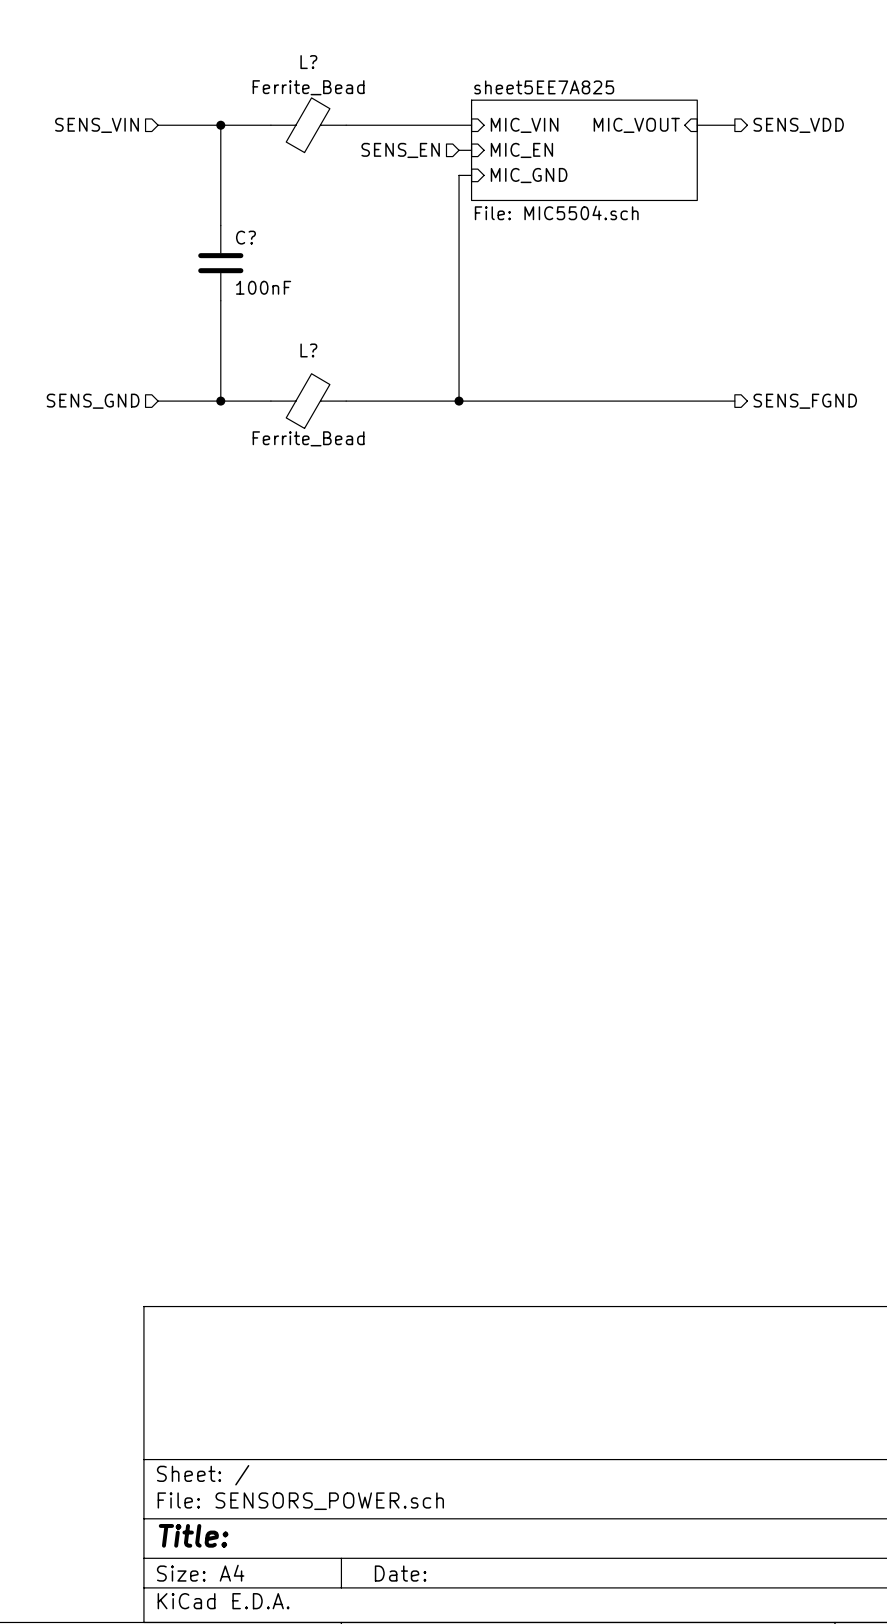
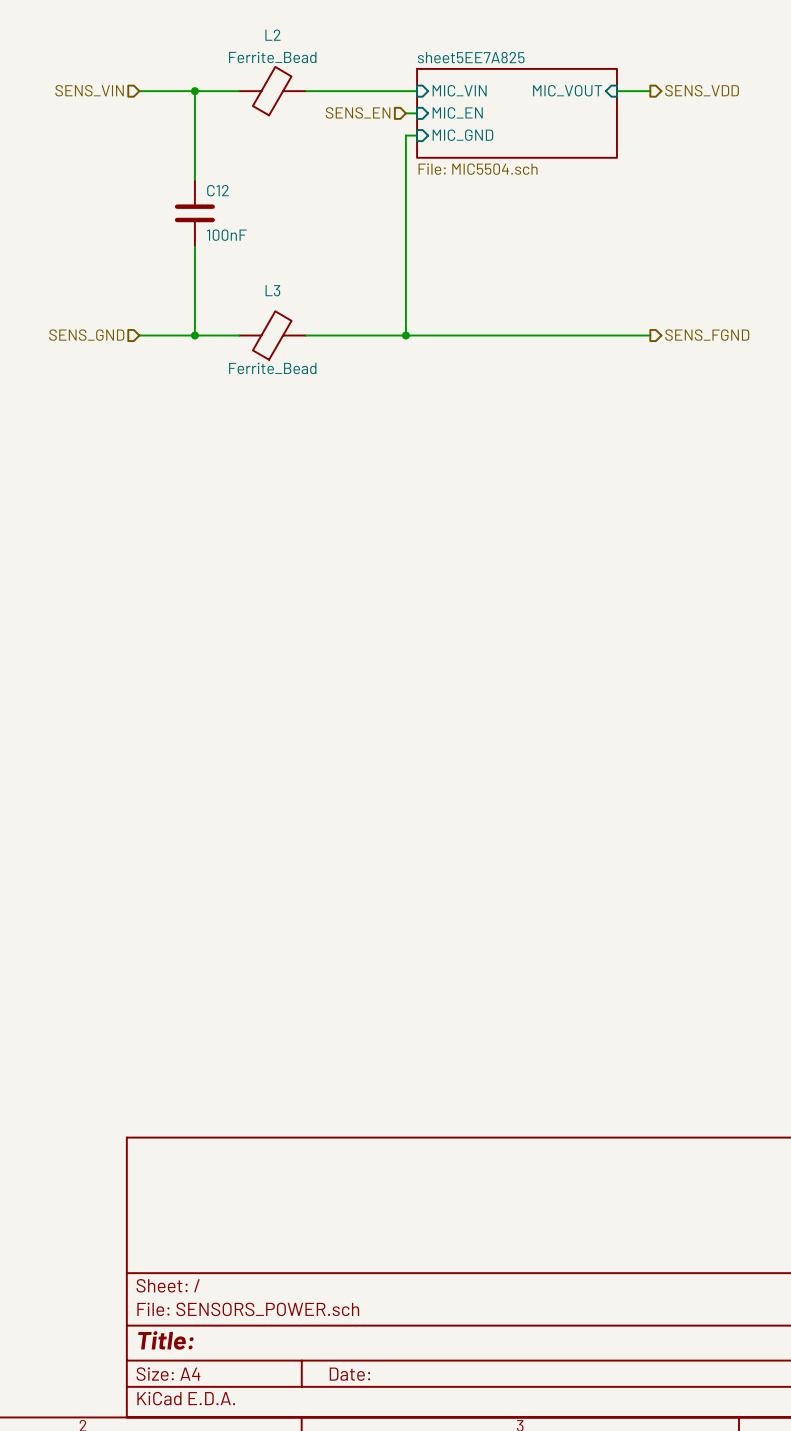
L? name: L? (308, 62) -> L2 (272, 35)
C? name: C? (245, 237) -> C12 (217, 190)
L? name: L? (308, 350) -> L3 (272, 290)

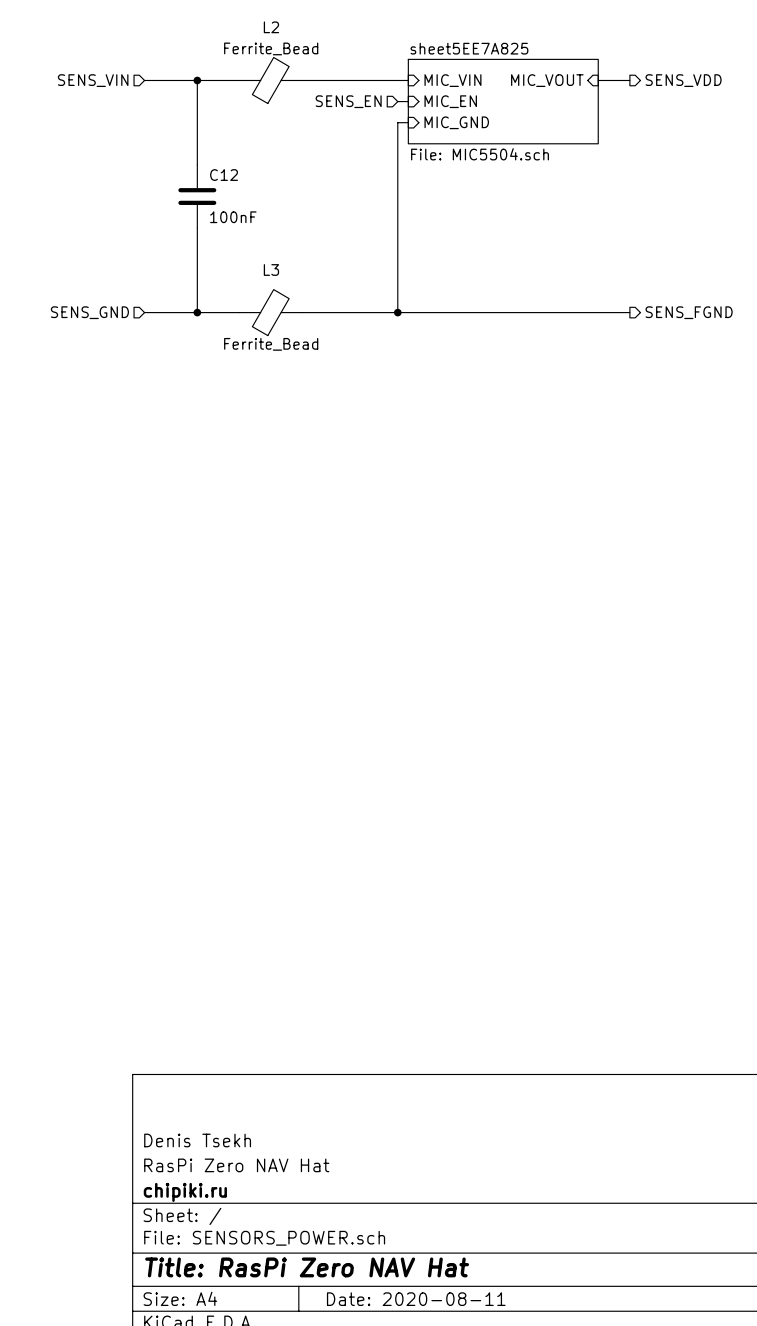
title block: none -> Denis Tsekh (197, 1140)
title block: none -> RasPi Zero NAV Hat (236, 1165)
title block: none -> chipiki.ru (185, 1192)
title block: Title: (165, 1340) -> Title: RasPi Zero NAV Hat (307, 1267)
title block: Date: (349, 1374) -> Date: 2020-08-11 (416, 1299)

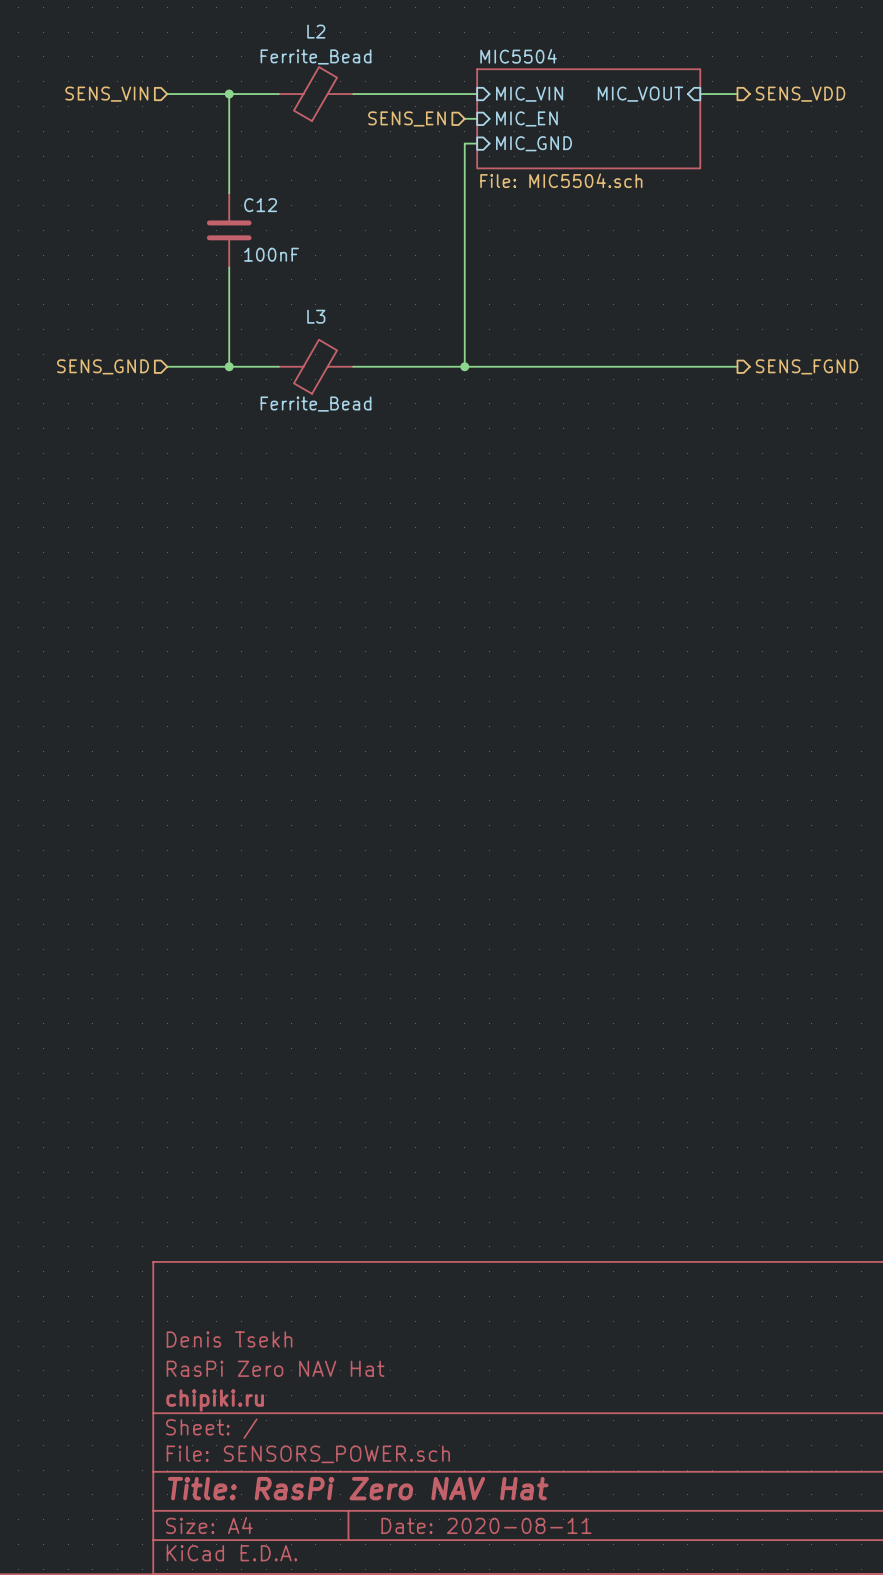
sheet sheet5EE7A825 name: sheet5EE7A825 (469, 48) -> MIC5504 (518, 56)

